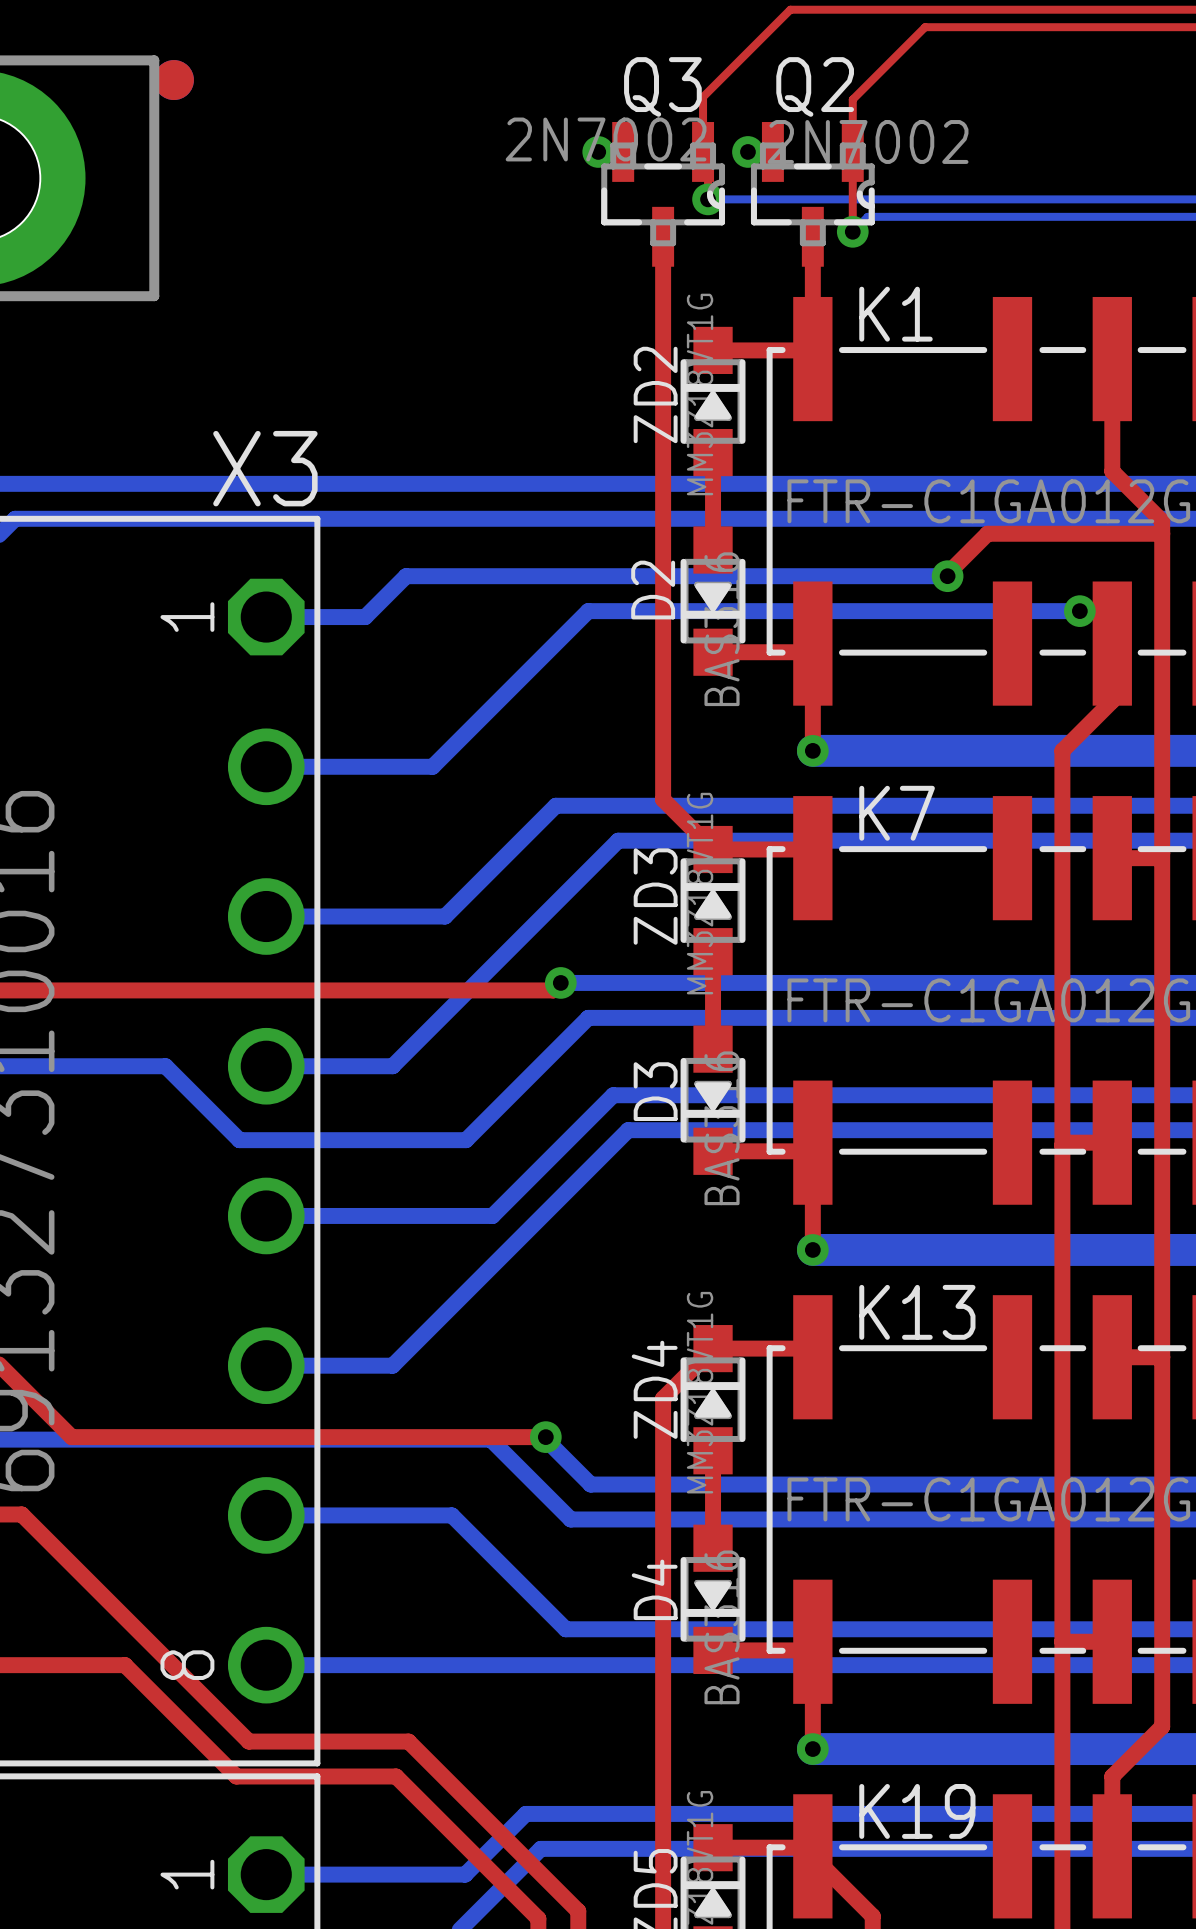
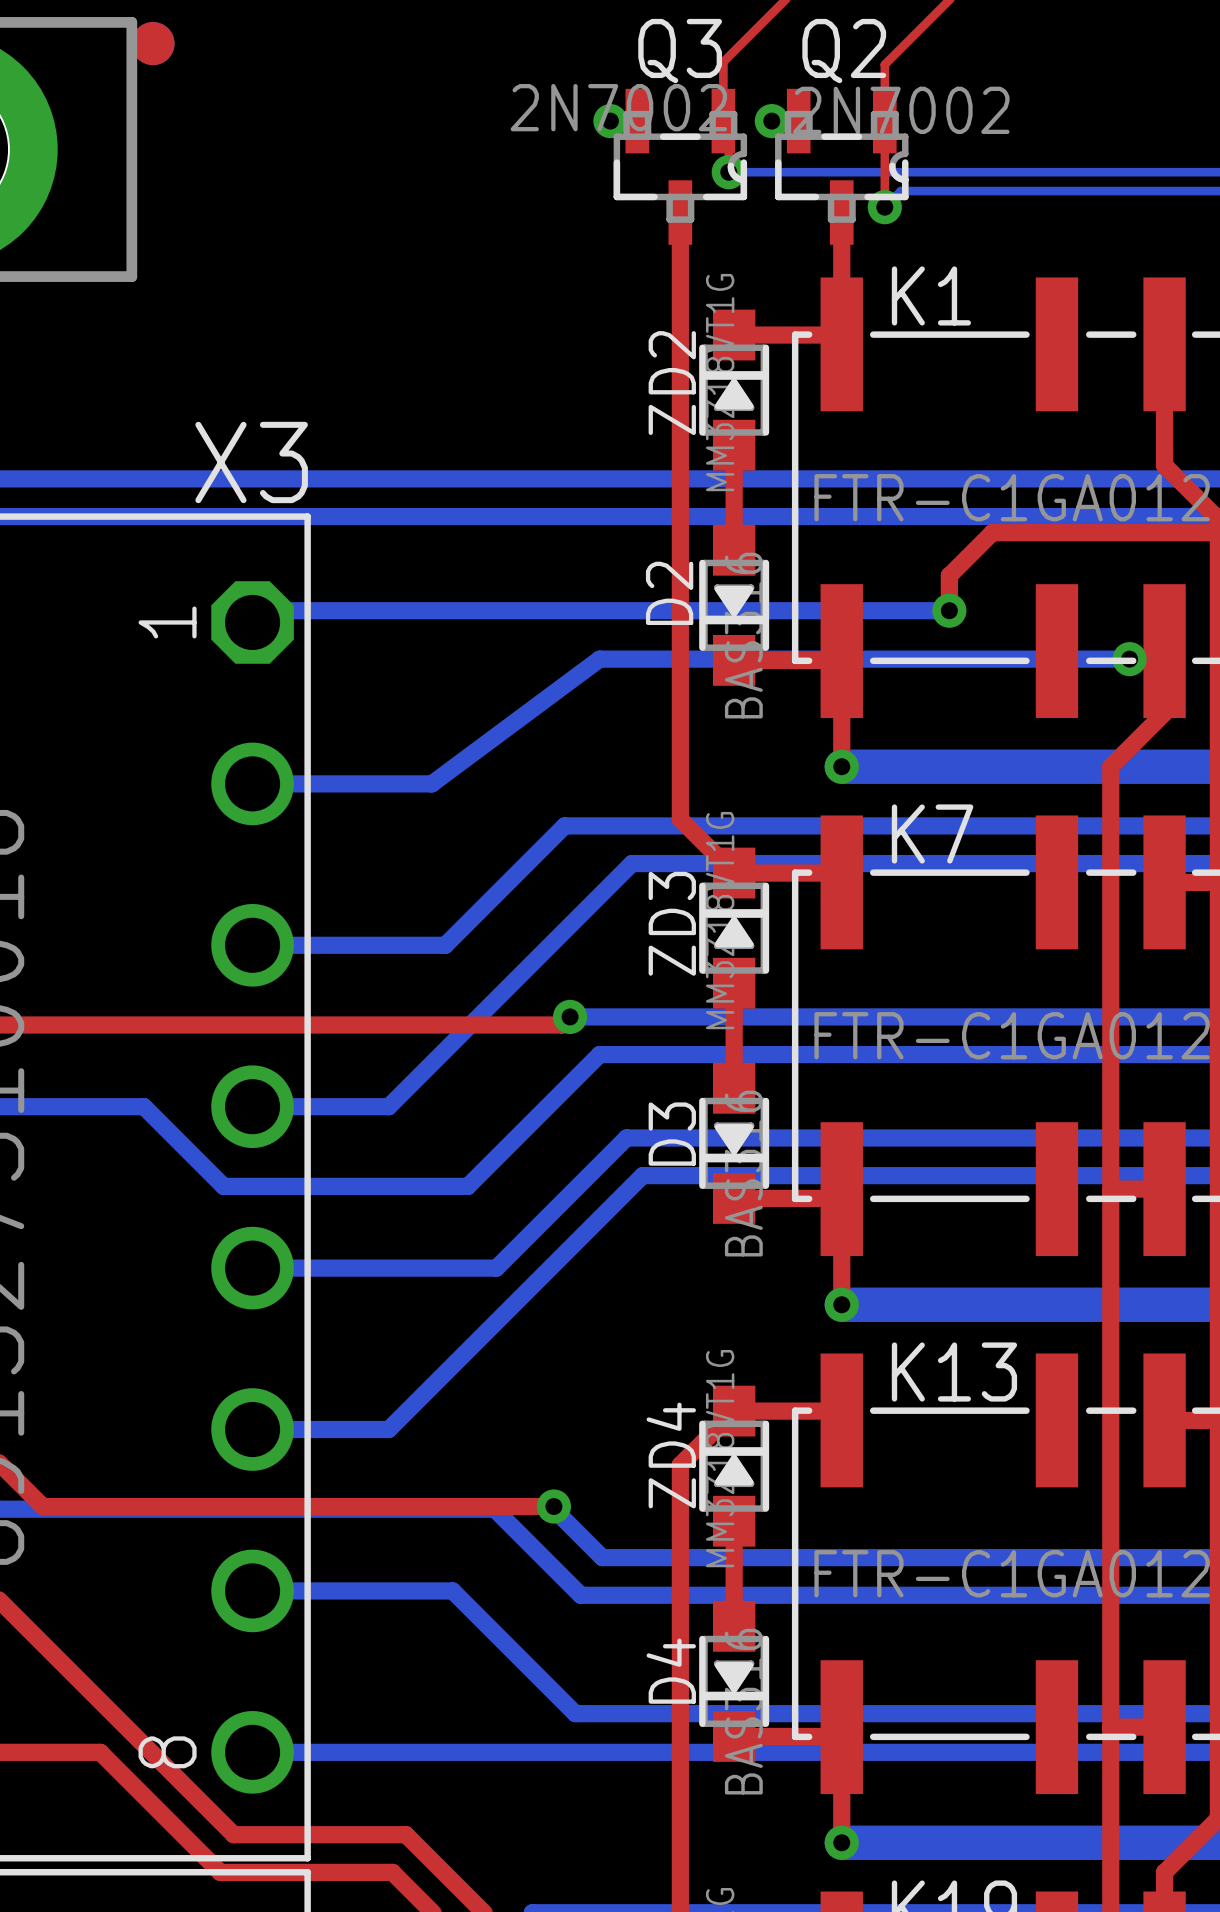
top track: (987, 533) (947, 573) (947, 576) -> (1030, 532) (992, 532) (949, 575) (949, 610)
bottom track: (947, 576) (406, 576) (365, 617) (266, 617) -> (949, 610) (264, 610) (252, 622)
via position: (947, 576) -> (949, 610)
bottom track: (1079, 611) (588, 611) (432, 766) -> (1129, 659) (599, 659) (431, 783)
via position: (1079, 611) -> (1129, 659)

